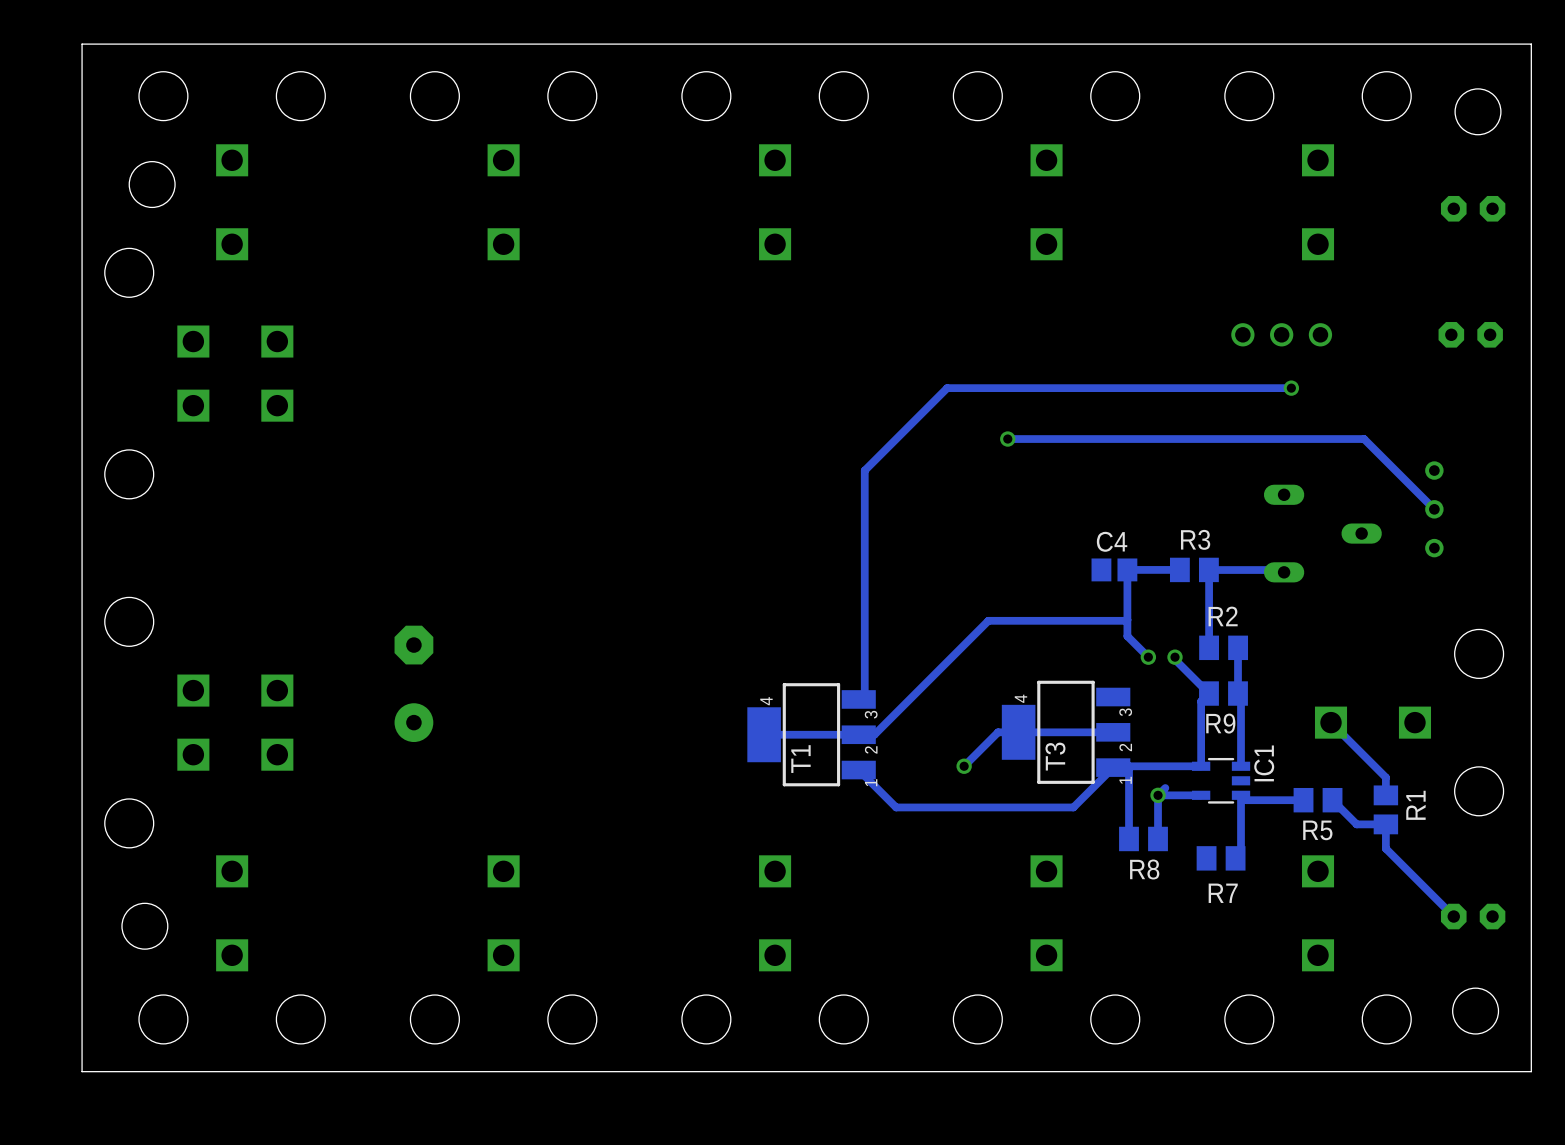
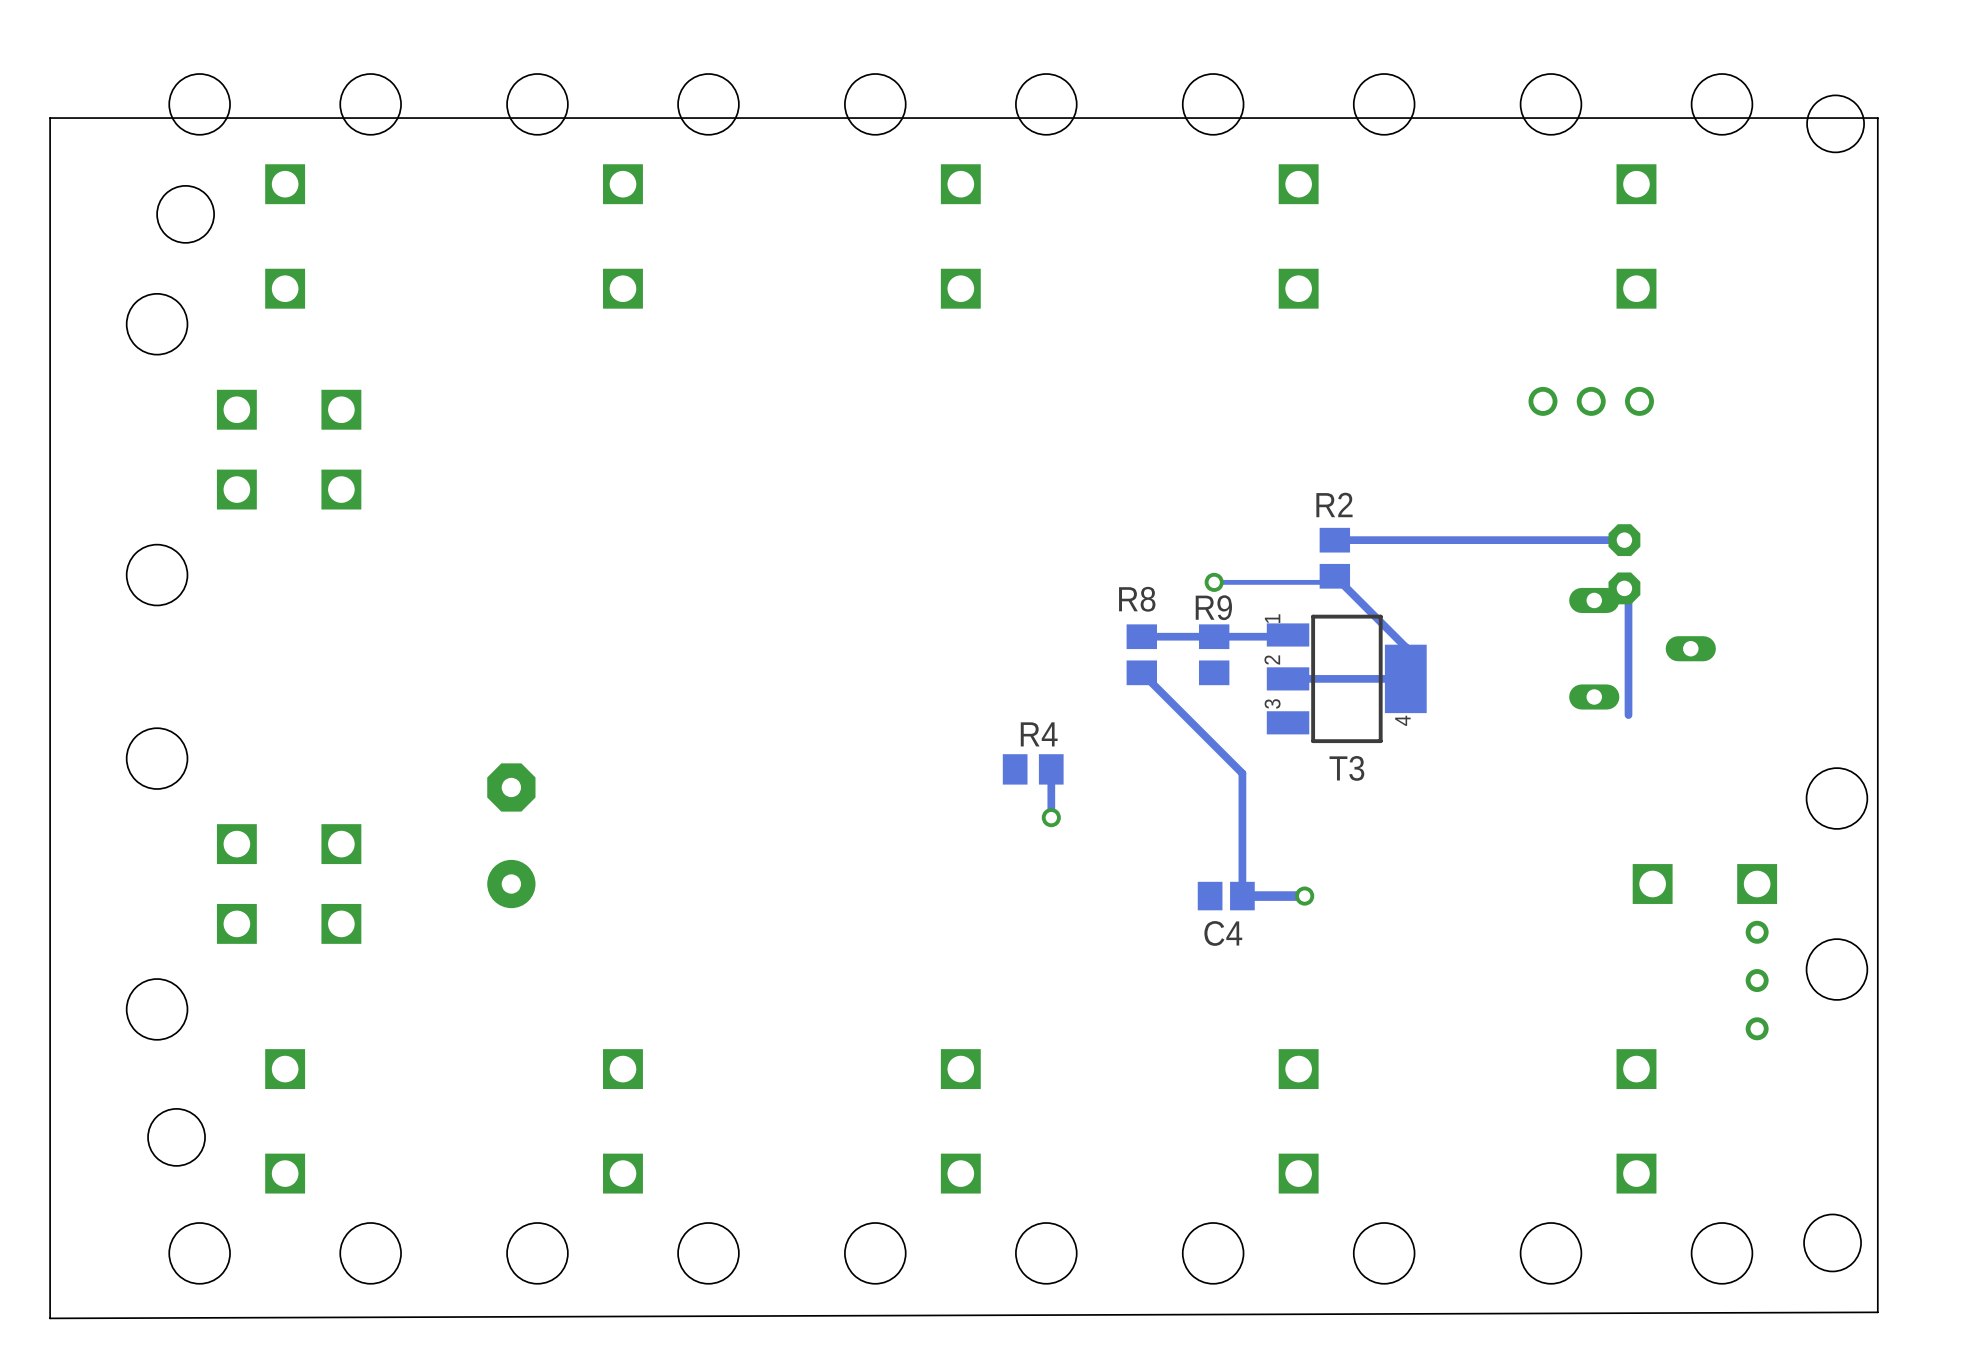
board edge: (1531, 44) (82, 44) (82, 1071) (1531, 1071) (1531, 44) -> (1877, 118) (1877, 1312) (50, 1318) (50, 118) (1877, 118)
part: (1473, 208) -> none
part: (1470, 334) -> none
track: (1291, 388) (947, 388) (864, 470) (864, 693) (858, 699) -> none
via: (1291, 388) -> none
track: (1007, 439) (1364, 439) (1434, 509) -> none
via position: (1007, 439) -> (1214, 582)
track: none -> (1624, 540) (1334, 540)
part: none -> (1624, 564)
track: none -> (1214, 582) (1328, 582) (1334, 576) (1405, 647) (1405, 678) (1288, 678)
track: none -> (1624, 588) (1628, 588) (1628, 715)
part position: (1434, 509) -> (1757, 980)
track: none -> (1288, 634) (1286, 636) (1141, 636)
C4 name position: C4 (1112, 541) -> C4 (1223, 933)
C4 position: (1114, 569) -> (1226, 896)
track: (1179, 569) (1127, 569) (1127, 636) (1148, 657) -> none
R3: (1194, 569) -> none
track: (1284, 572) (1281, 570) (1209, 570) (1209, 647) -> none
track: (1127, 619) (988, 620) (874, 734) (764, 734) (756, 742) -> none
R4: none -> (1033, 769)
track: none -> (1051, 769) (1051, 817)
R2 rotation: 0° (1223, 647) -> 90° clockwise (1334, 558)
R2 position: (1223, 647) -> (1334, 558)
track: (1238, 647) (1238, 693) (1241, 696) (1241, 766) -> none
via: (1148, 657) -> none
track: (1175, 657) (1175, 659) (1208, 693) -> none
via: (1175, 657) -> none
via: none -> (1051, 817)
T3 footprint: [1001, 680, 1131, 784] -> [1266, 614, 1427, 744]
track: (1208, 693) (1201, 701) (1201, 766) (1114, 766) (1073, 807) (896, 807) (858, 770) -> none
R9 rotation: 0° (1223, 693) -> 90° clockwise (1214, 654)
R9 position: (1223, 693) -> (1214, 654)
track: (1331, 722) (1385, 777) (1385, 795) -> none
R9 name position: R9 (1220, 723) -> R9 (1213, 607)
track: (1001, 732) (998, 732) (964, 766) -> (1242, 896) (1242, 773) (1141, 672)
via: none -> (1304, 896)
track: (1113, 732) (1051, 732) -> none
T1: (811, 734) -> none
T3 name position: T3 (1055, 756) -> T3 (1346, 768)
via: (964, 766) -> none
track: (1129, 766) (1129, 838) -> none
IC1: (1221, 780) -> none
track: (1165, 788) (1158, 795) (1158, 838) -> none
via: (1158, 795) -> none
track: (1201, 795) (1158, 795) -> none
track: (1303, 800) (1245, 800) (1241, 795) (1241, 852) (1235, 858) -> none
R5: (1318, 800) -> none
track: (1332, 800) (1356, 824) (1385, 824) (1385, 848) (1453, 916) -> none
R1: (1385, 809) -> none
R8 rotation: 0° (1143, 838) -> 90° clockwise (1141, 654)
R8 position: (1143, 838) -> (1141, 654)
R7: (1221, 858) -> none
R8 name position: R8 (1144, 869) -> R8 (1137, 599)
part: (1473, 916) -> none

